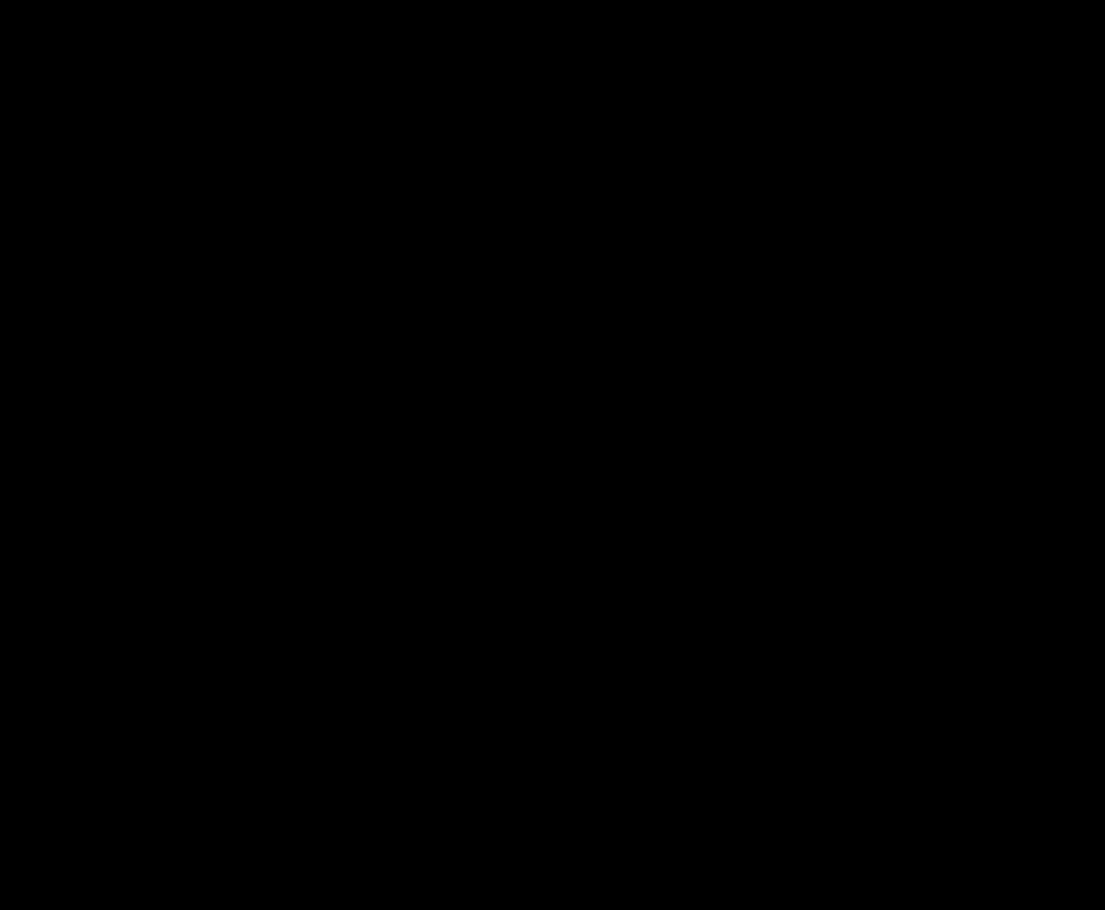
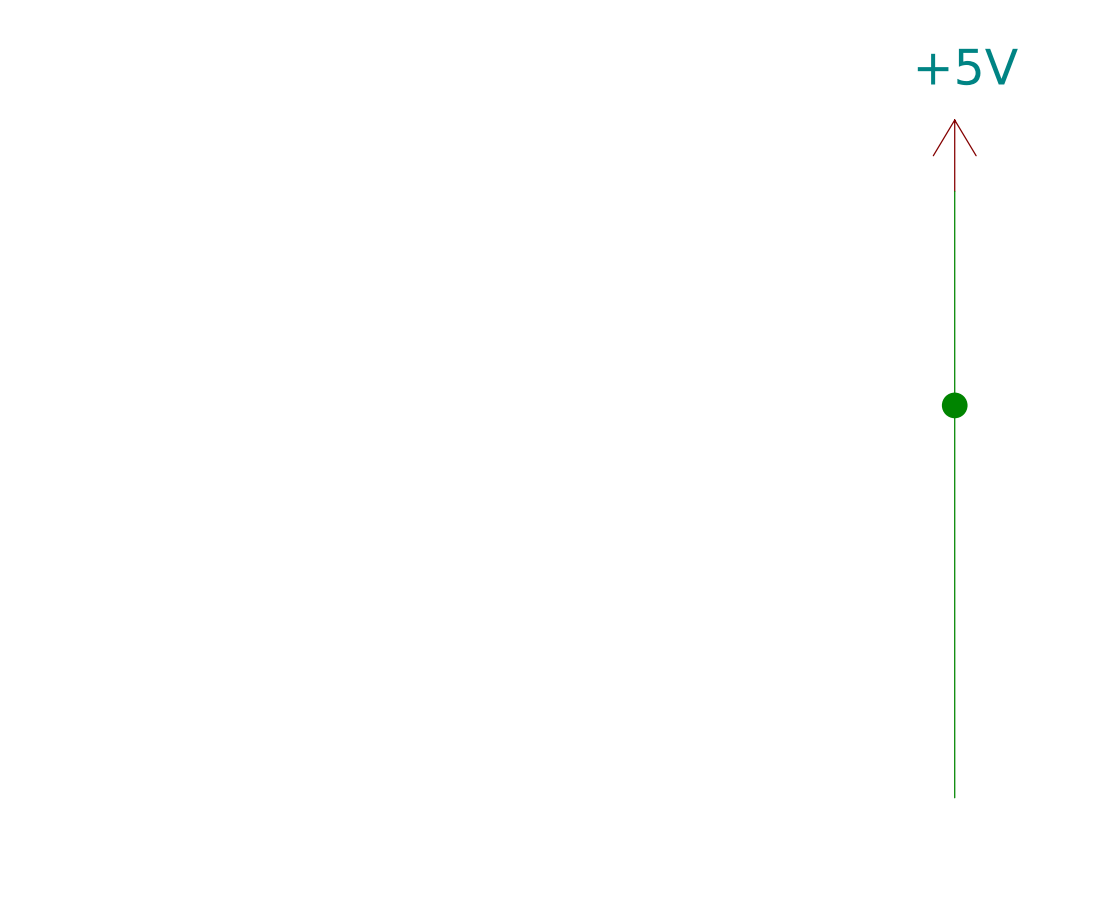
power symbol: none -> +5V (954, 155)
wire: none -> (954, 191) (954, 797)
junction: none -> (954, 405)

